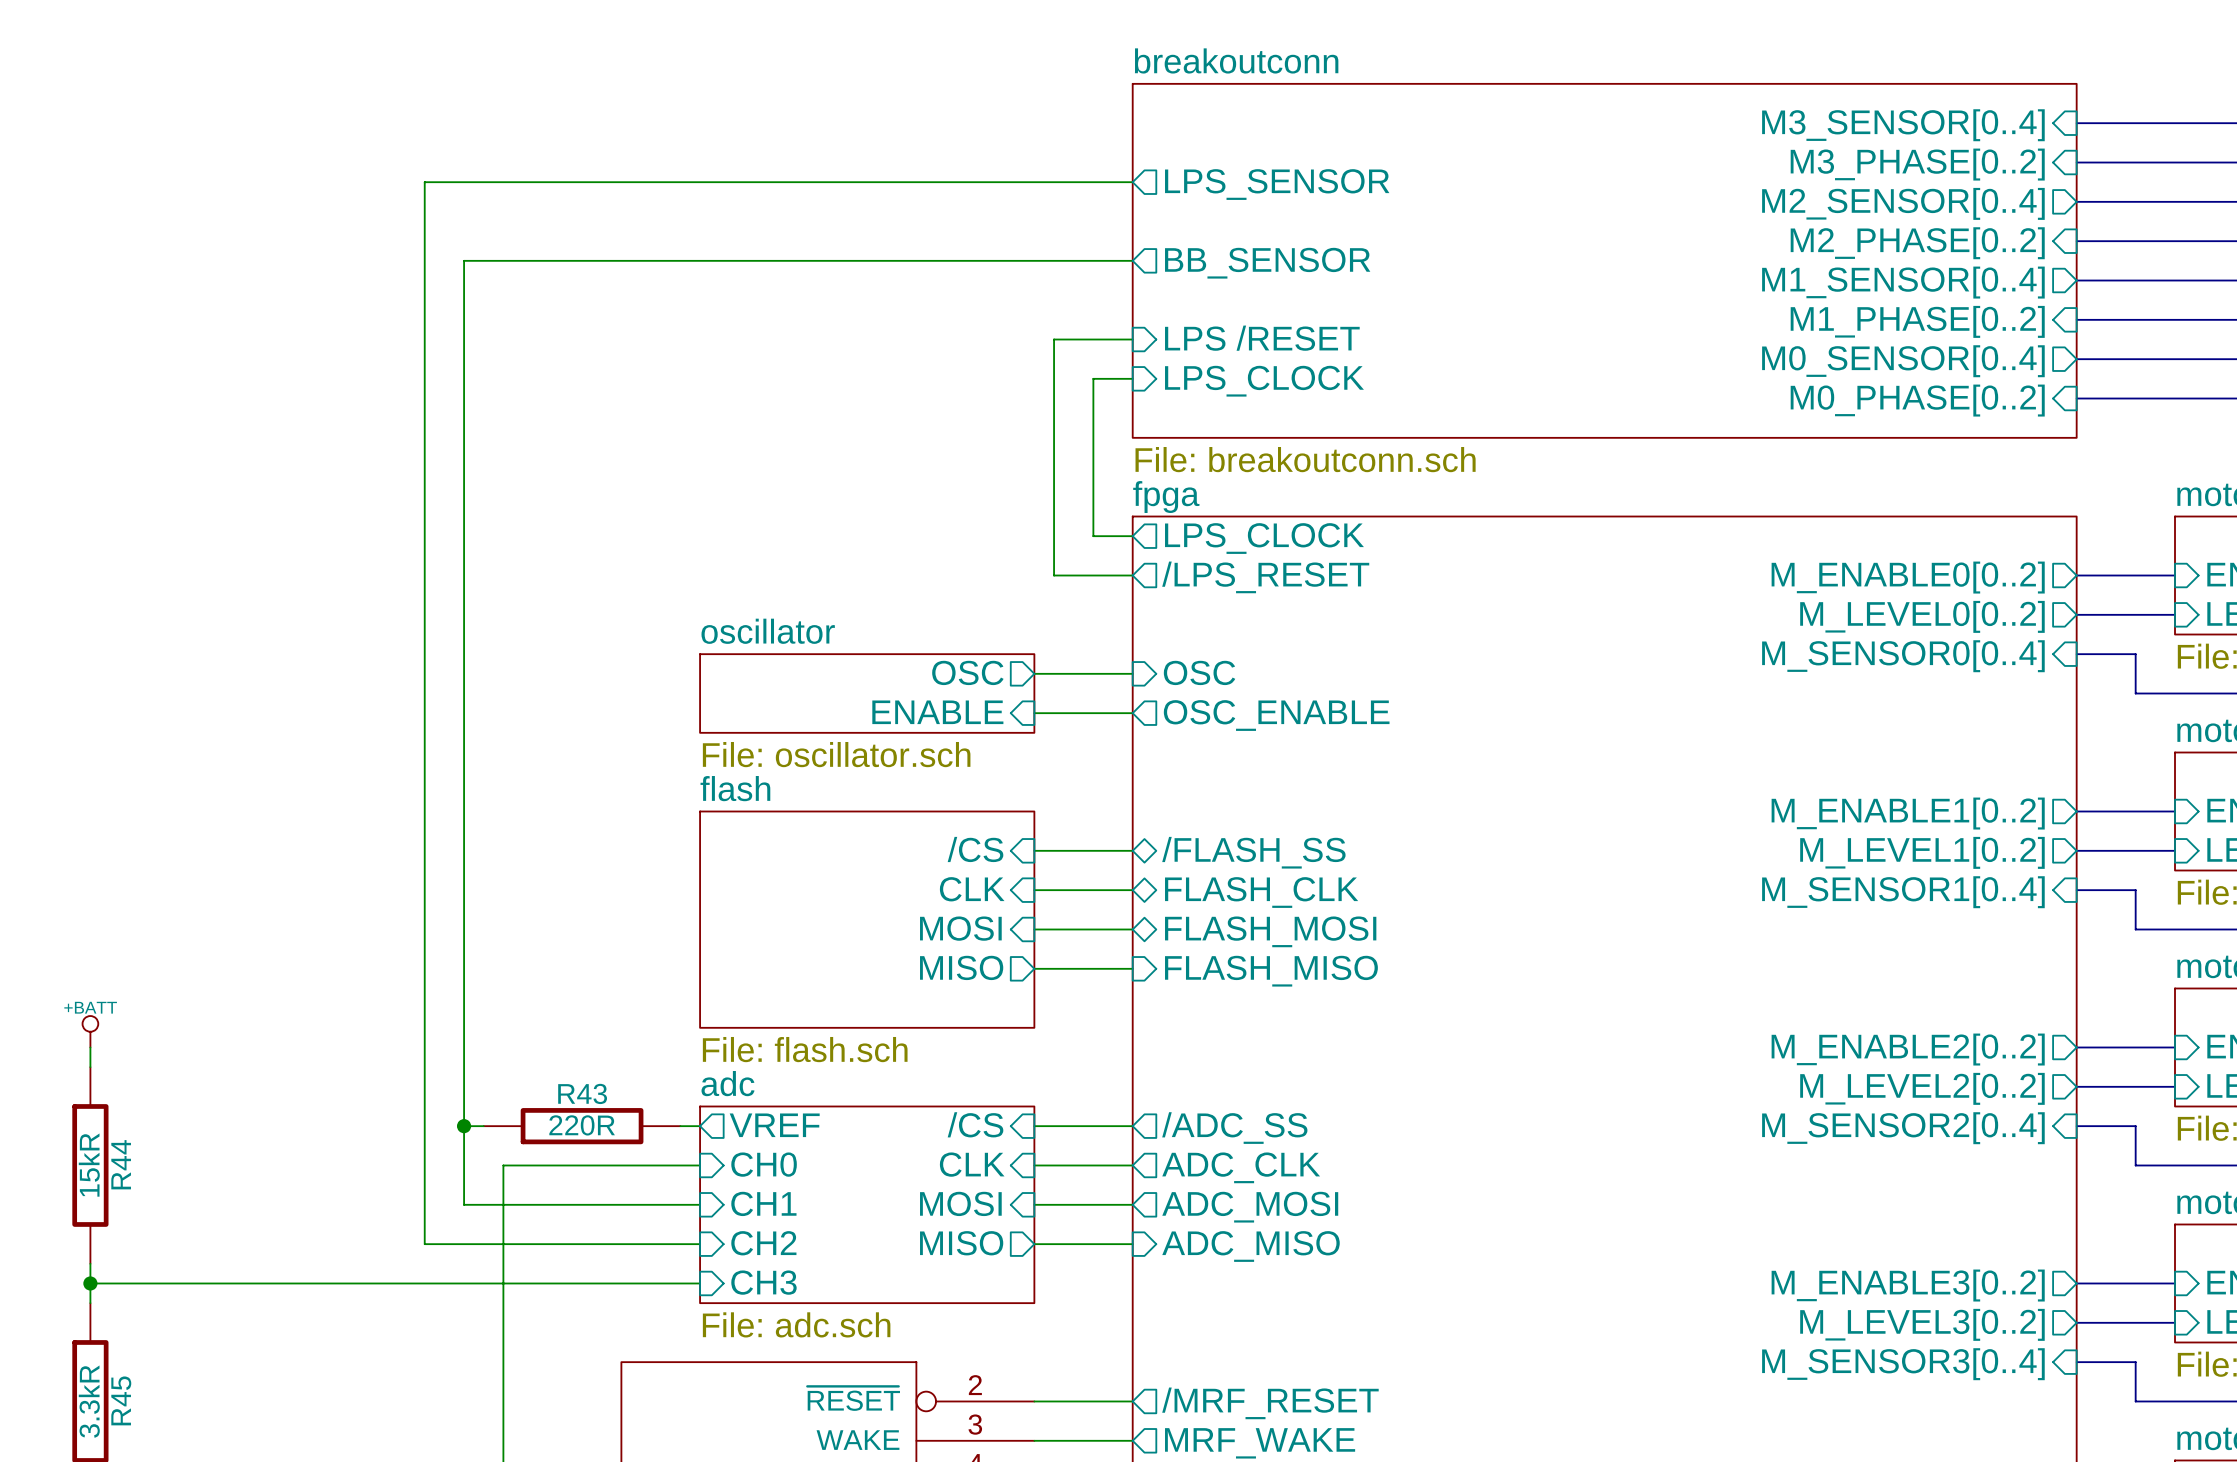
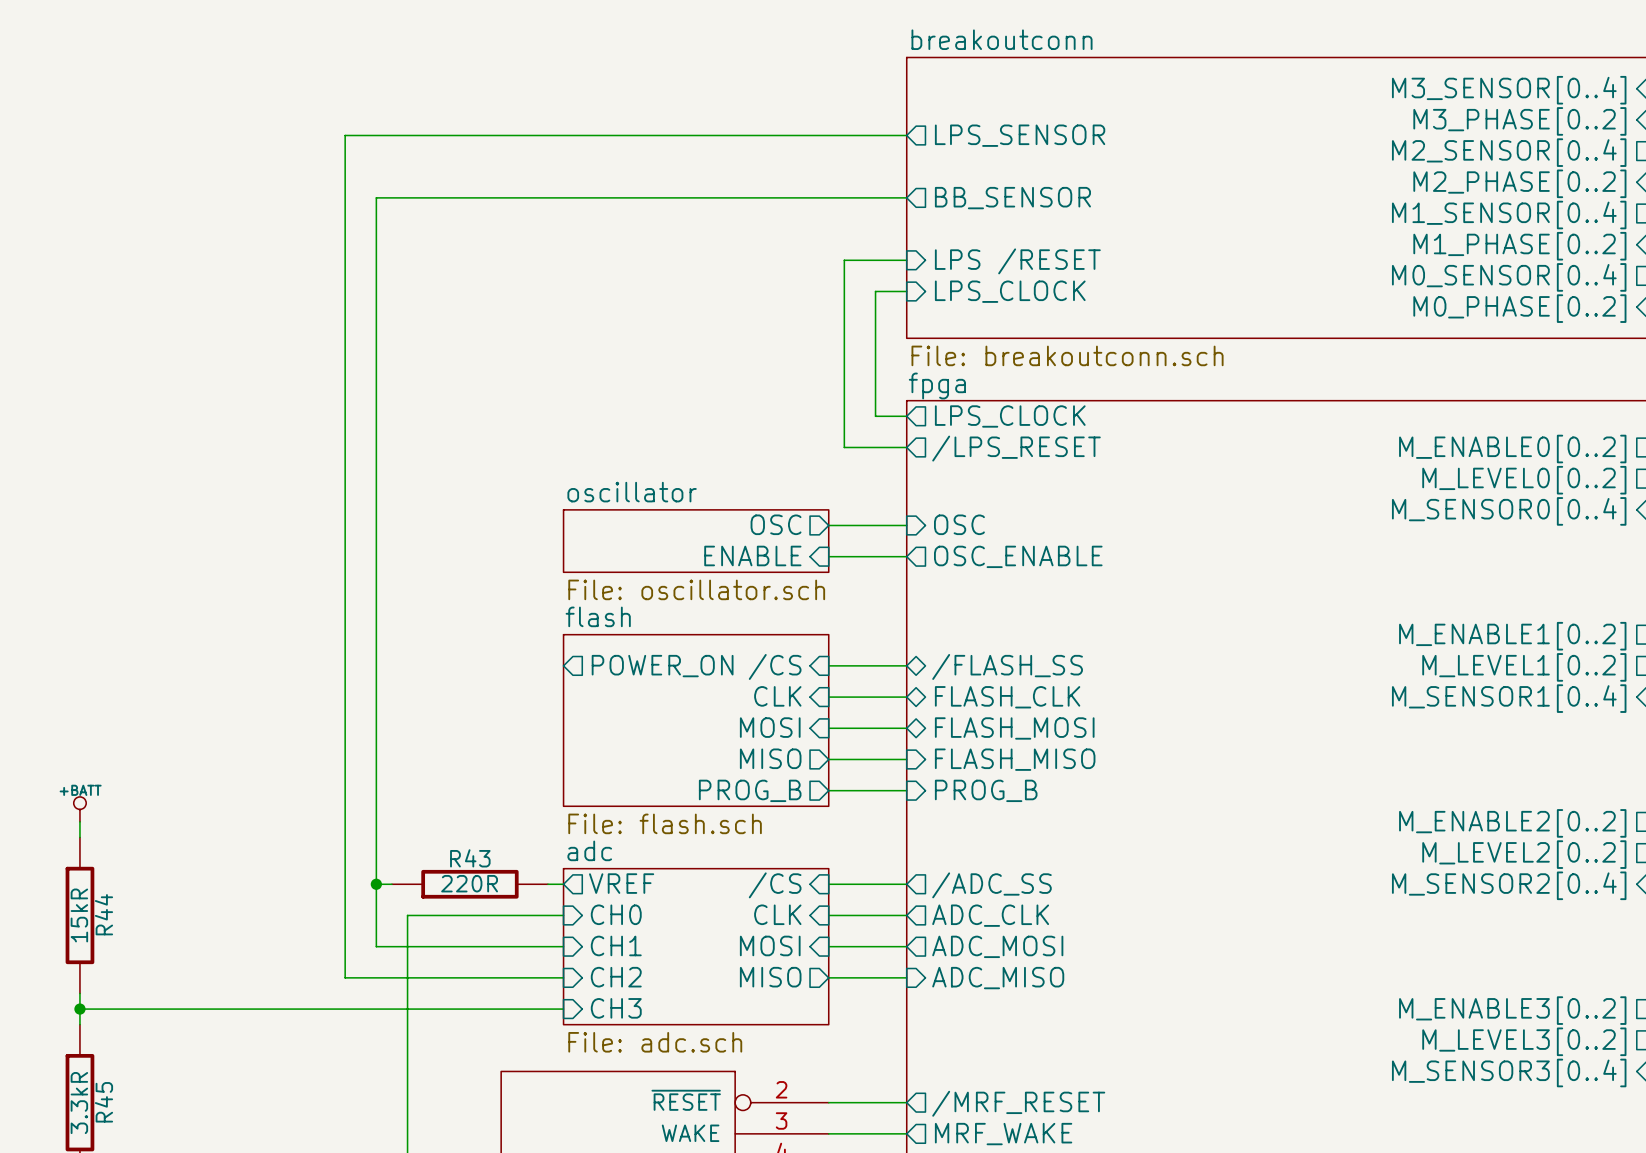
sheet pin: none -> POWER_ON (662, 666)
wire: none -> (828, 790) (906, 790)
sheet pin: none -> PROG_B (750, 790)
sheet pin: none -> PROG_B (986, 790)

